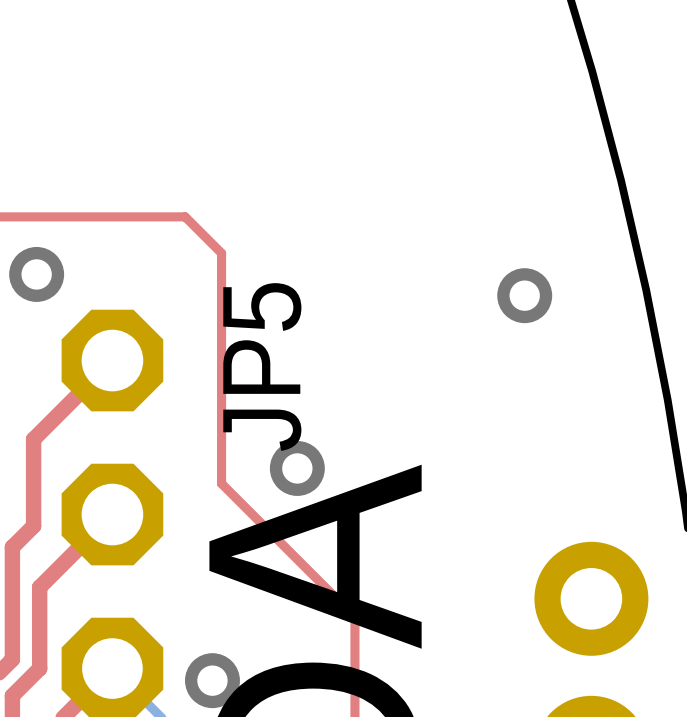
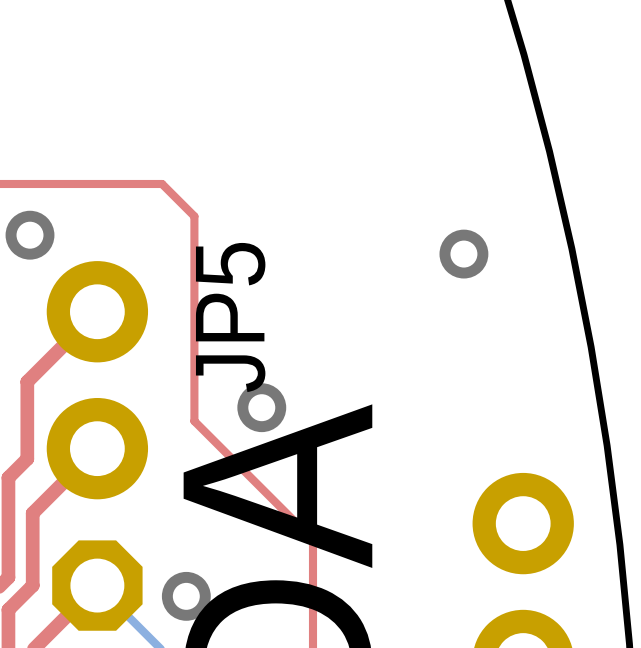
JP5 footprint: [61, 309, 164, 566] -> [46, 261, 149, 500]

